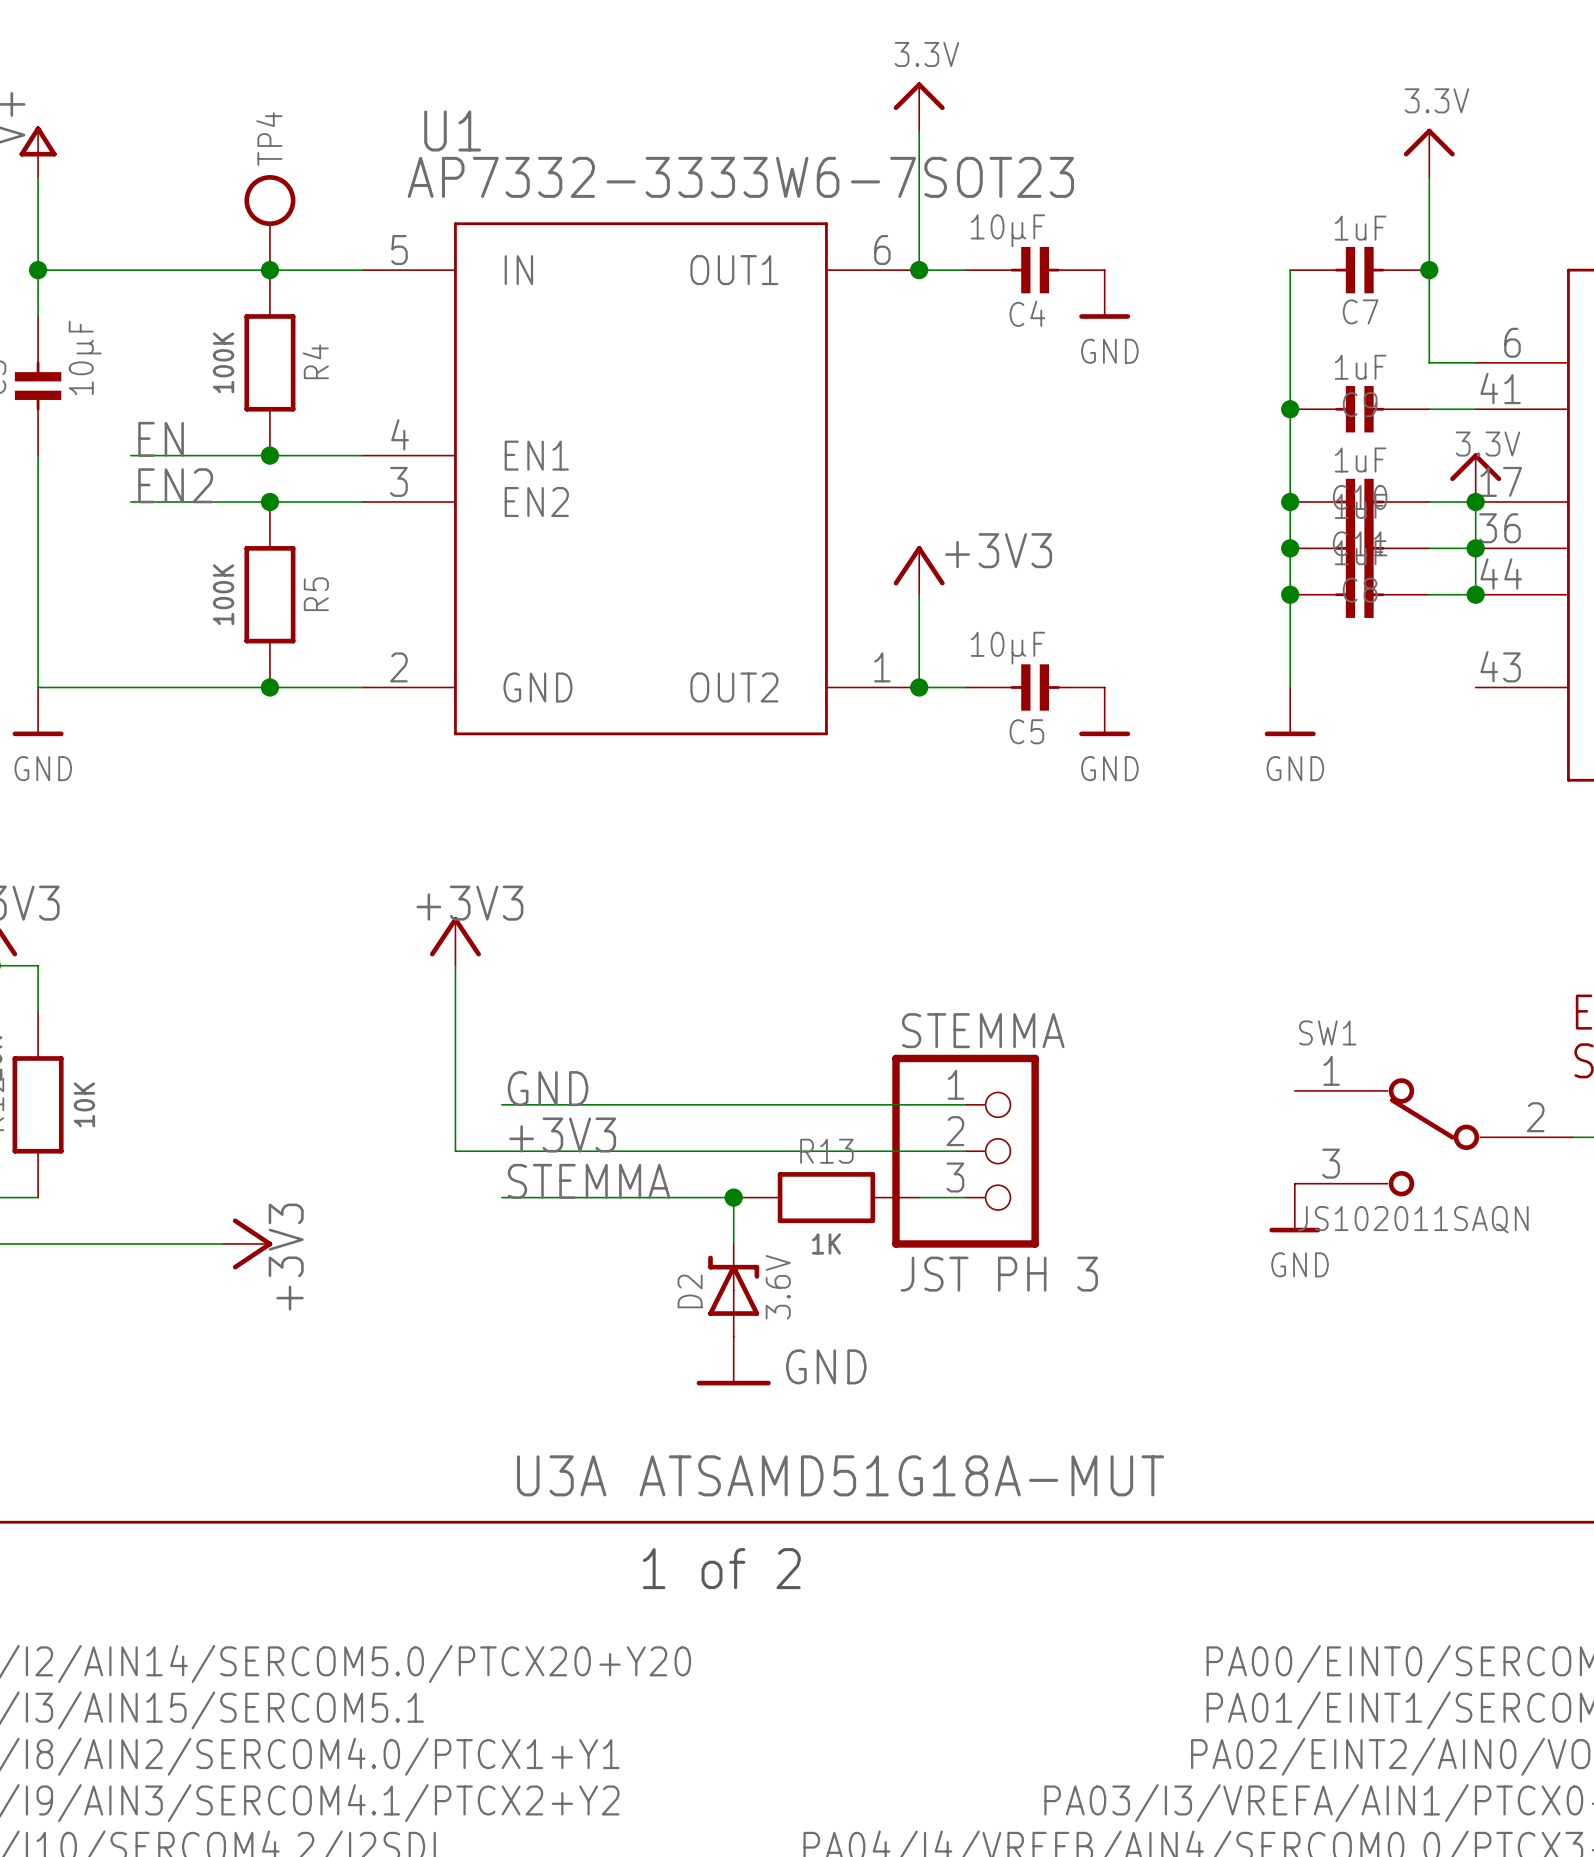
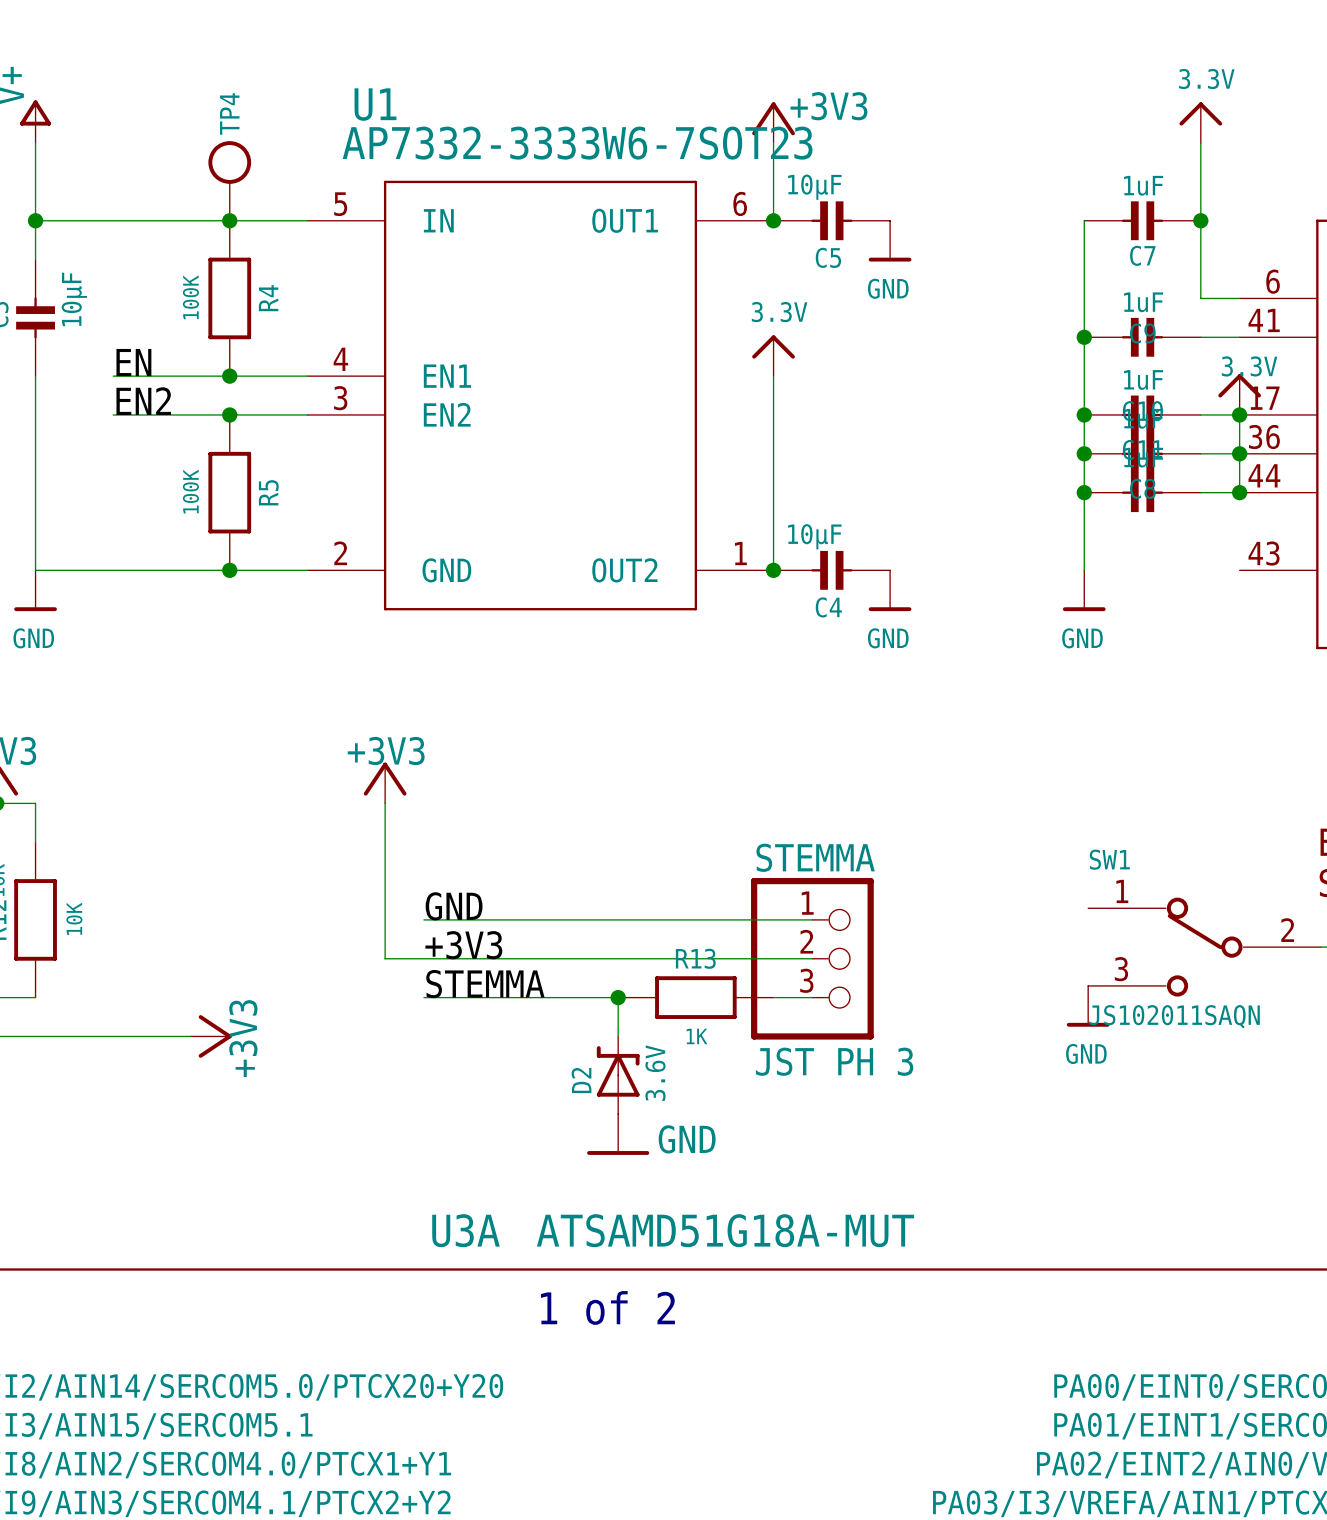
power symbol position: 3.3V (919, 106) -> 3.3V (773, 355)
C4 position: (1035, 270) -> (831, 570)
power symbol position: GND (1104, 294) -> GND (890, 241)
wire: none -> (773, 376) (773, 492)
power symbol position: +3V3 (919, 570) -> +3V3 (773, 122)
C5 position: (1035, 687) -> (831, 220)
power symbol position: GND (1104, 711) -> GND (890, 590)

